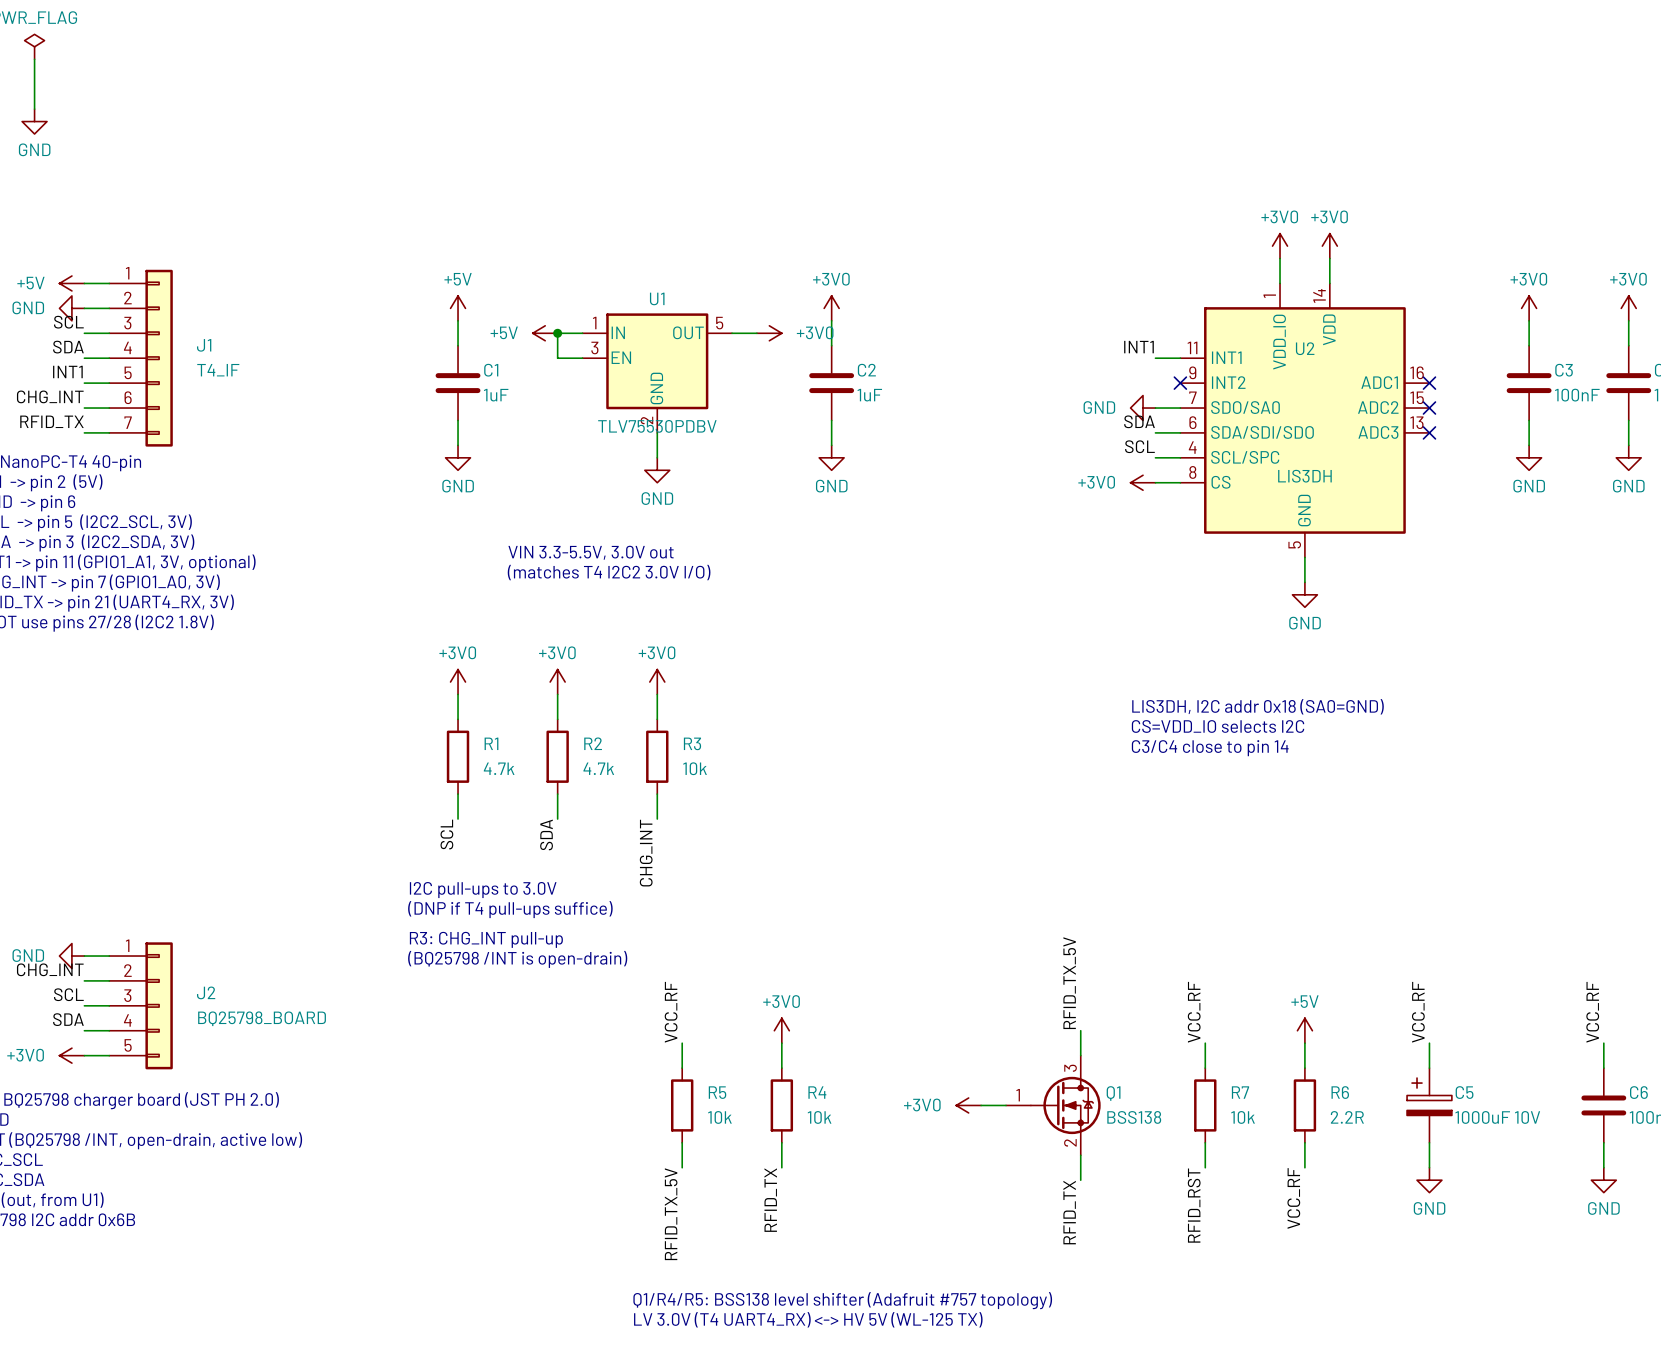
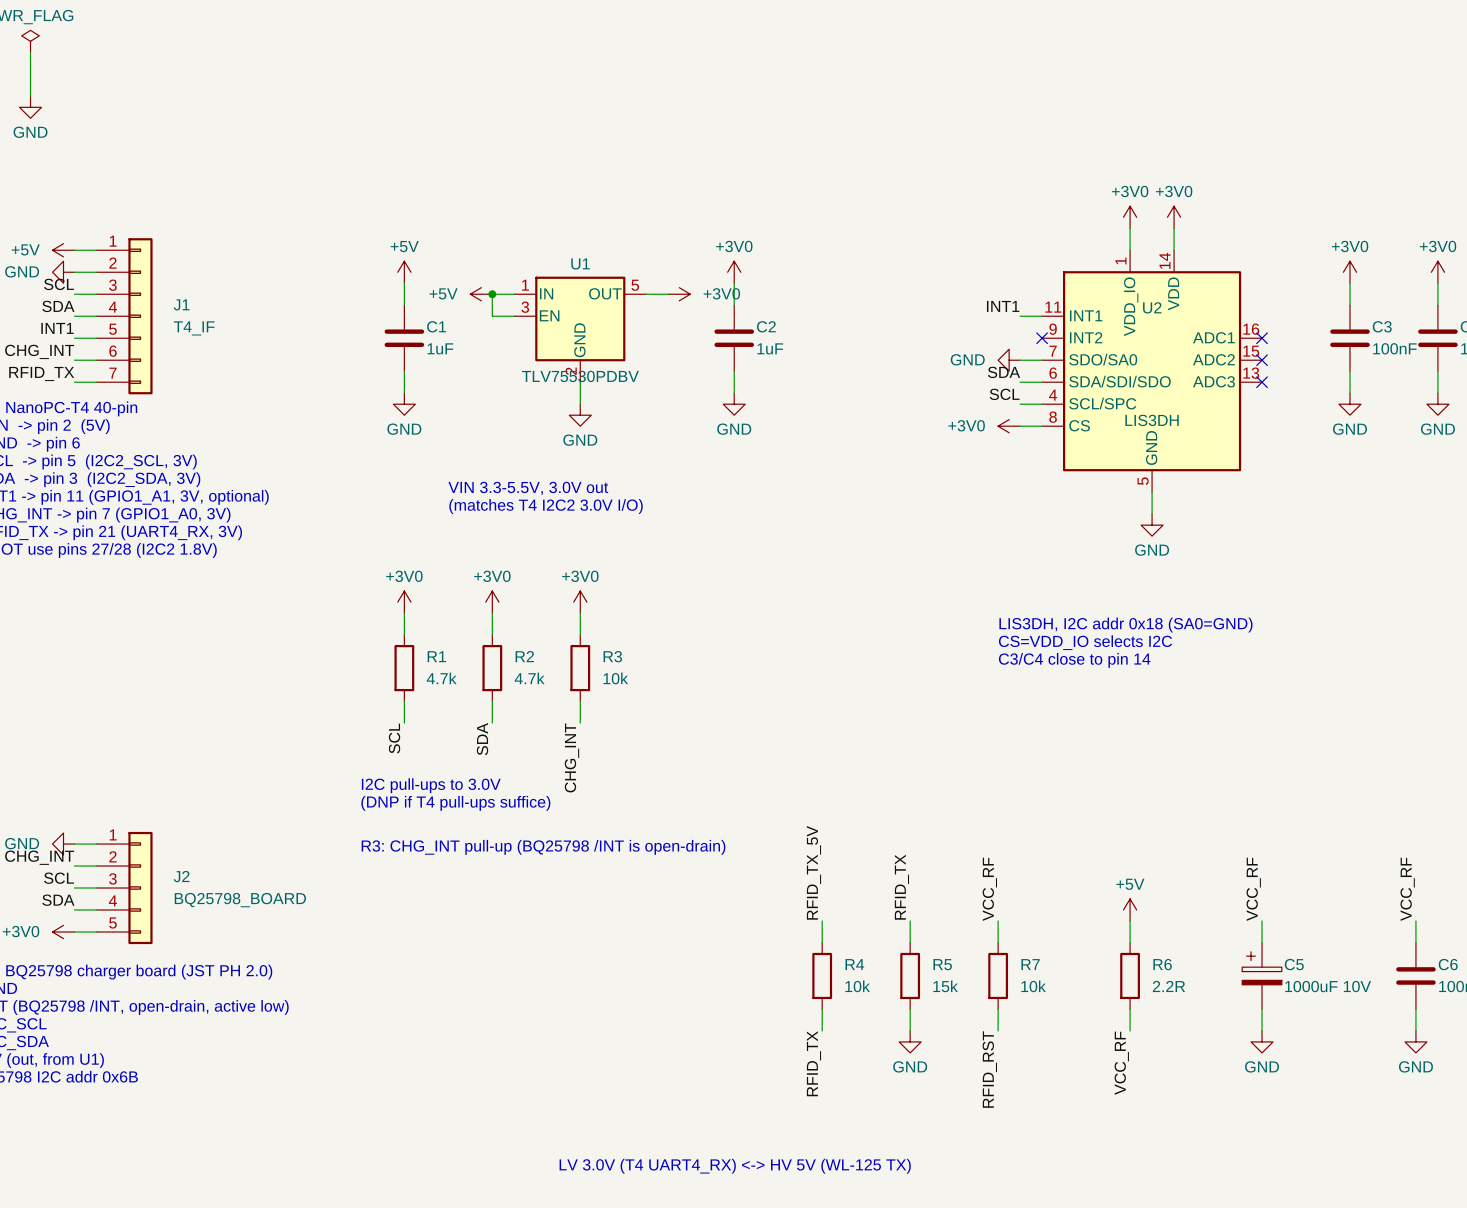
text: R3: CHG_INT pull-up (486, 939) -> none
text: (BQ25798 /INT is open-drain) (517, 959) -> R3: CHG_INT pull-up (BQ25798 /INT is open-drain) (543, 847)
label: RFID_TX_5V (1069, 983) -> none
label: none -> RFID_TX_5V (813, 872)
label: none -> RFID_TX (901, 887)
label: VCC_RF (671, 1012) -> none
label: none -> VCC_RF (989, 889)
label: VCC_RF (1194, 1012) -> none
power symbol: +3V0 (781, 1030) -> none
wire: (1080, 1030) (1080, 1055) -> (1130, 920) (1130, 942)
power symbol position: +5V (1304, 1030) -> +5V (1130, 910)
wire: (682, 1043) (682, 1068) -> none
wire: (781, 1043) (781, 1068) -> (822, 920) (822, 942)
wire: (1205, 1043) (1205, 1068) -> (910, 920) (910, 942)
wire: (1304, 1043) (1304, 1068) -> (998, 920) (998, 942)
R5 position: (682, 1105) -> (910, 975)
R4 position: (781, 1105) -> (822, 975)
power symbol: +3V0 (968, 1105) -> none
wire: (981, 1105) (1006, 1105) -> none
Q1: BSS138 (1053, 1105) -> none
R7 position: (1205, 1105) -> (998, 975)
R6 position: (1304, 1105) -> (1130, 975)
R5 value: 10k (719, 1117) -> 15k (945, 986)
wire: (682, 1142) (682, 1167) -> none
wire: (781, 1142) (781, 1167) -> (822, 1008) (822, 1030)
wire: (1205, 1142) (1205, 1167) -> (910, 1008) (910, 1030)
wire: (1304, 1142) (1304, 1167) -> (998, 1008) (998, 1030)
wire: (1080, 1155) (1080, 1180) -> (1130, 1008) (1130, 1030)
power symbol: none -> GND (910, 1041)
label position: VCC_RF (1293, 1198) -> VCC_RF (1121, 1063)
label: RFID_TX (770, 1200) -> none
label: none -> RFID_TX (813, 1063)
label position: RFID_RST (1194, 1205) -> RFID_RST (989, 1069)
label: RFID_TX (1069, 1212) -> none
label: RFID_TX_5V (671, 1214) -> none
text: Q1/R4/R5: BSS138 level shifter (Adafruit #757 topology) (842, 1300) -> none

